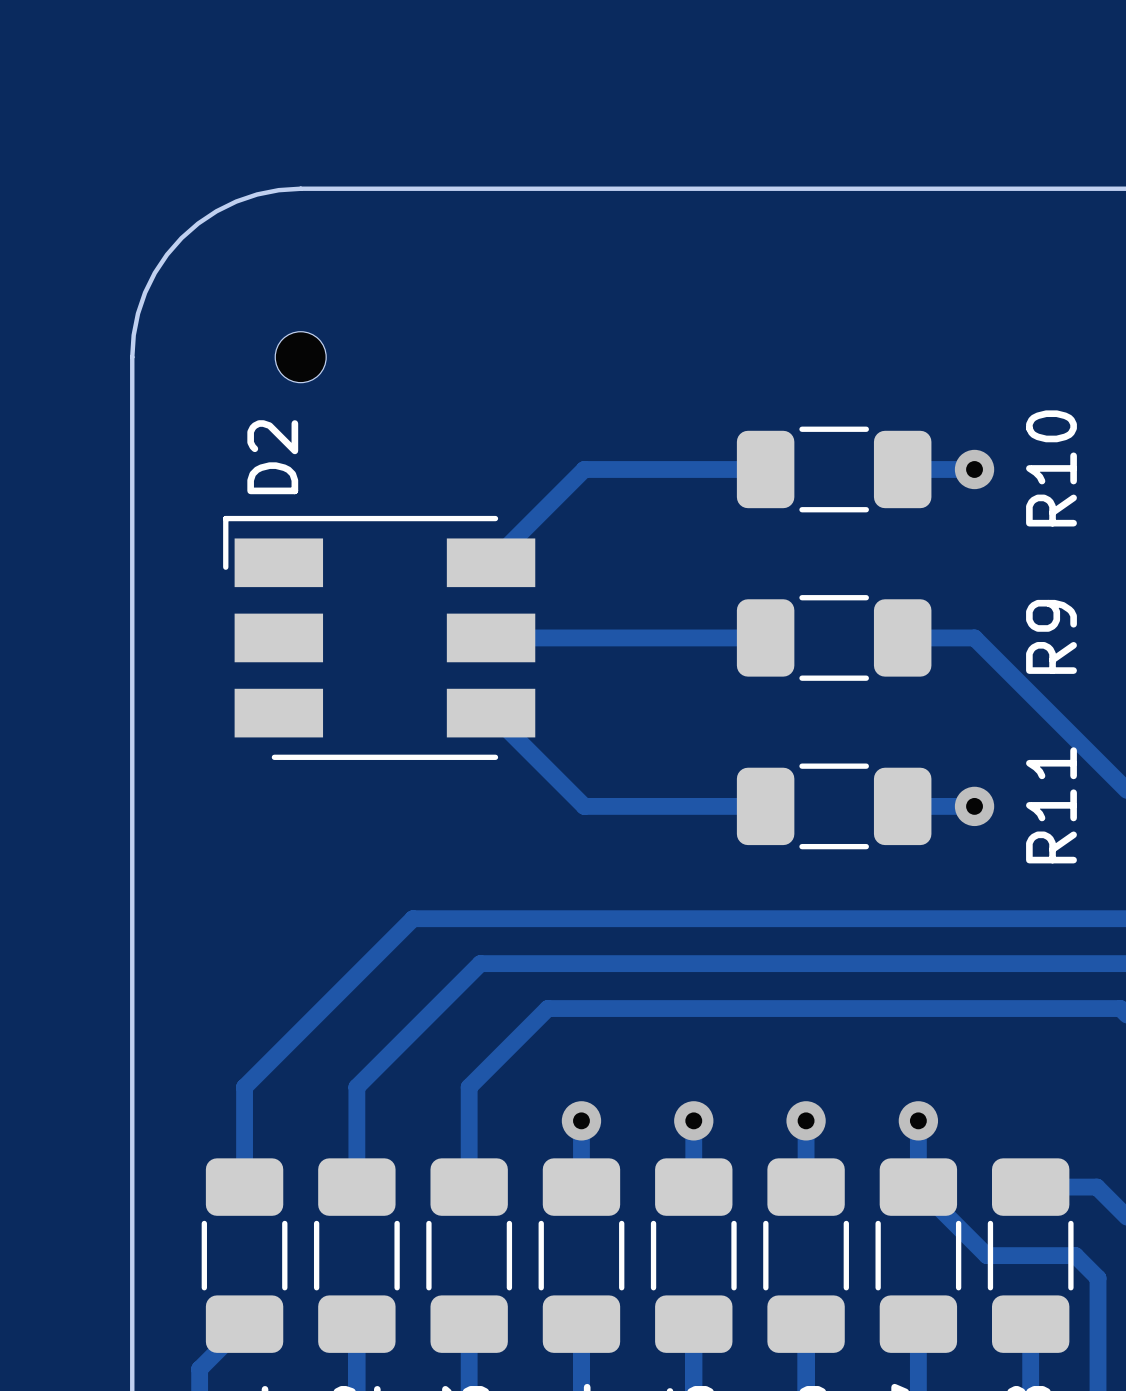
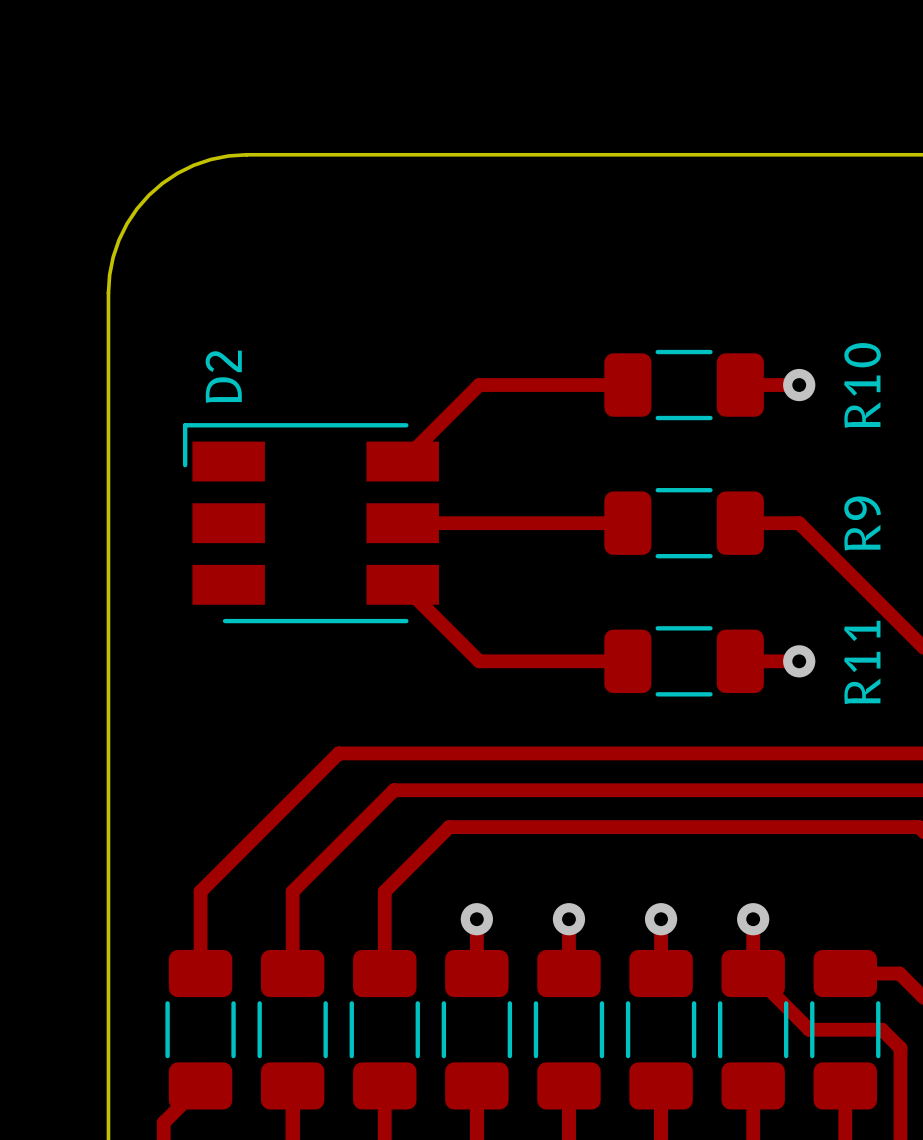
part: (300, 357) -> none

